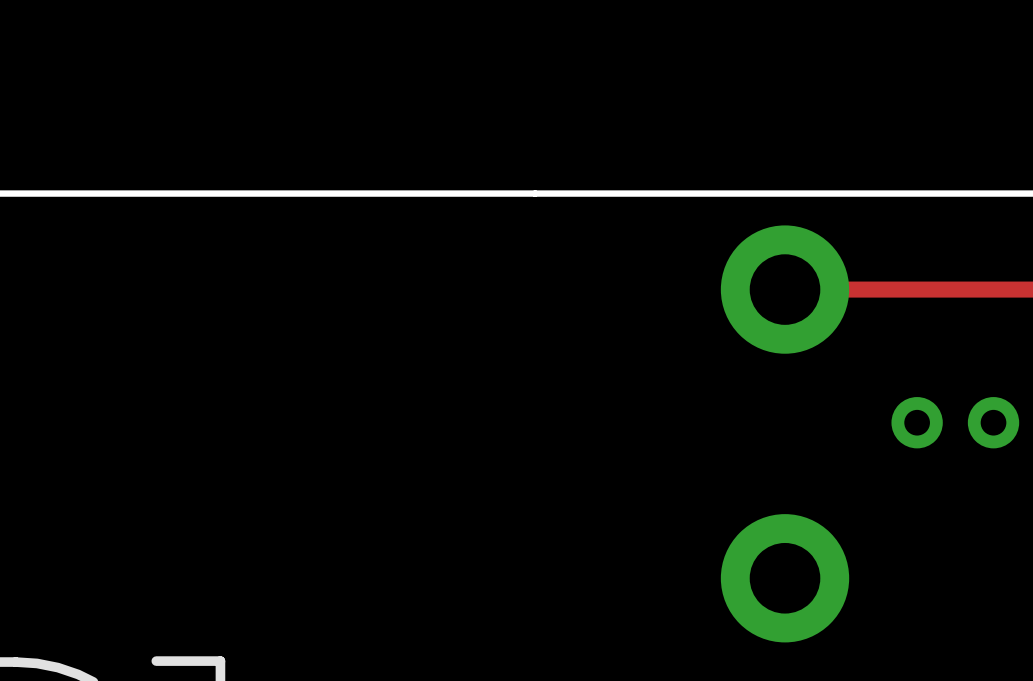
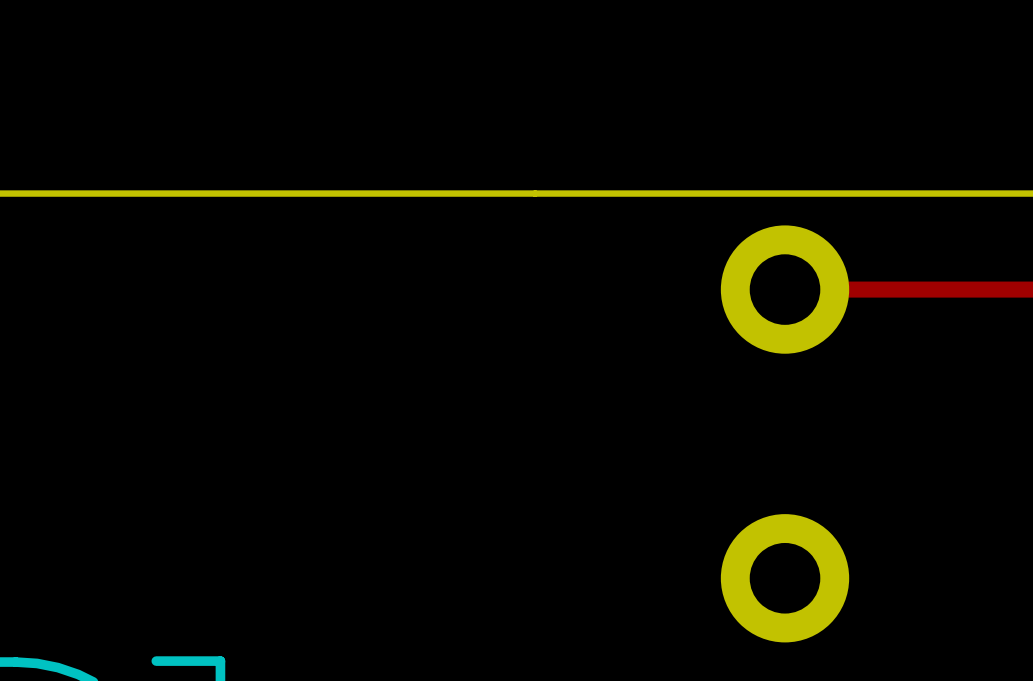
via: (917, 422) -> none
via: (993, 422) -> none

